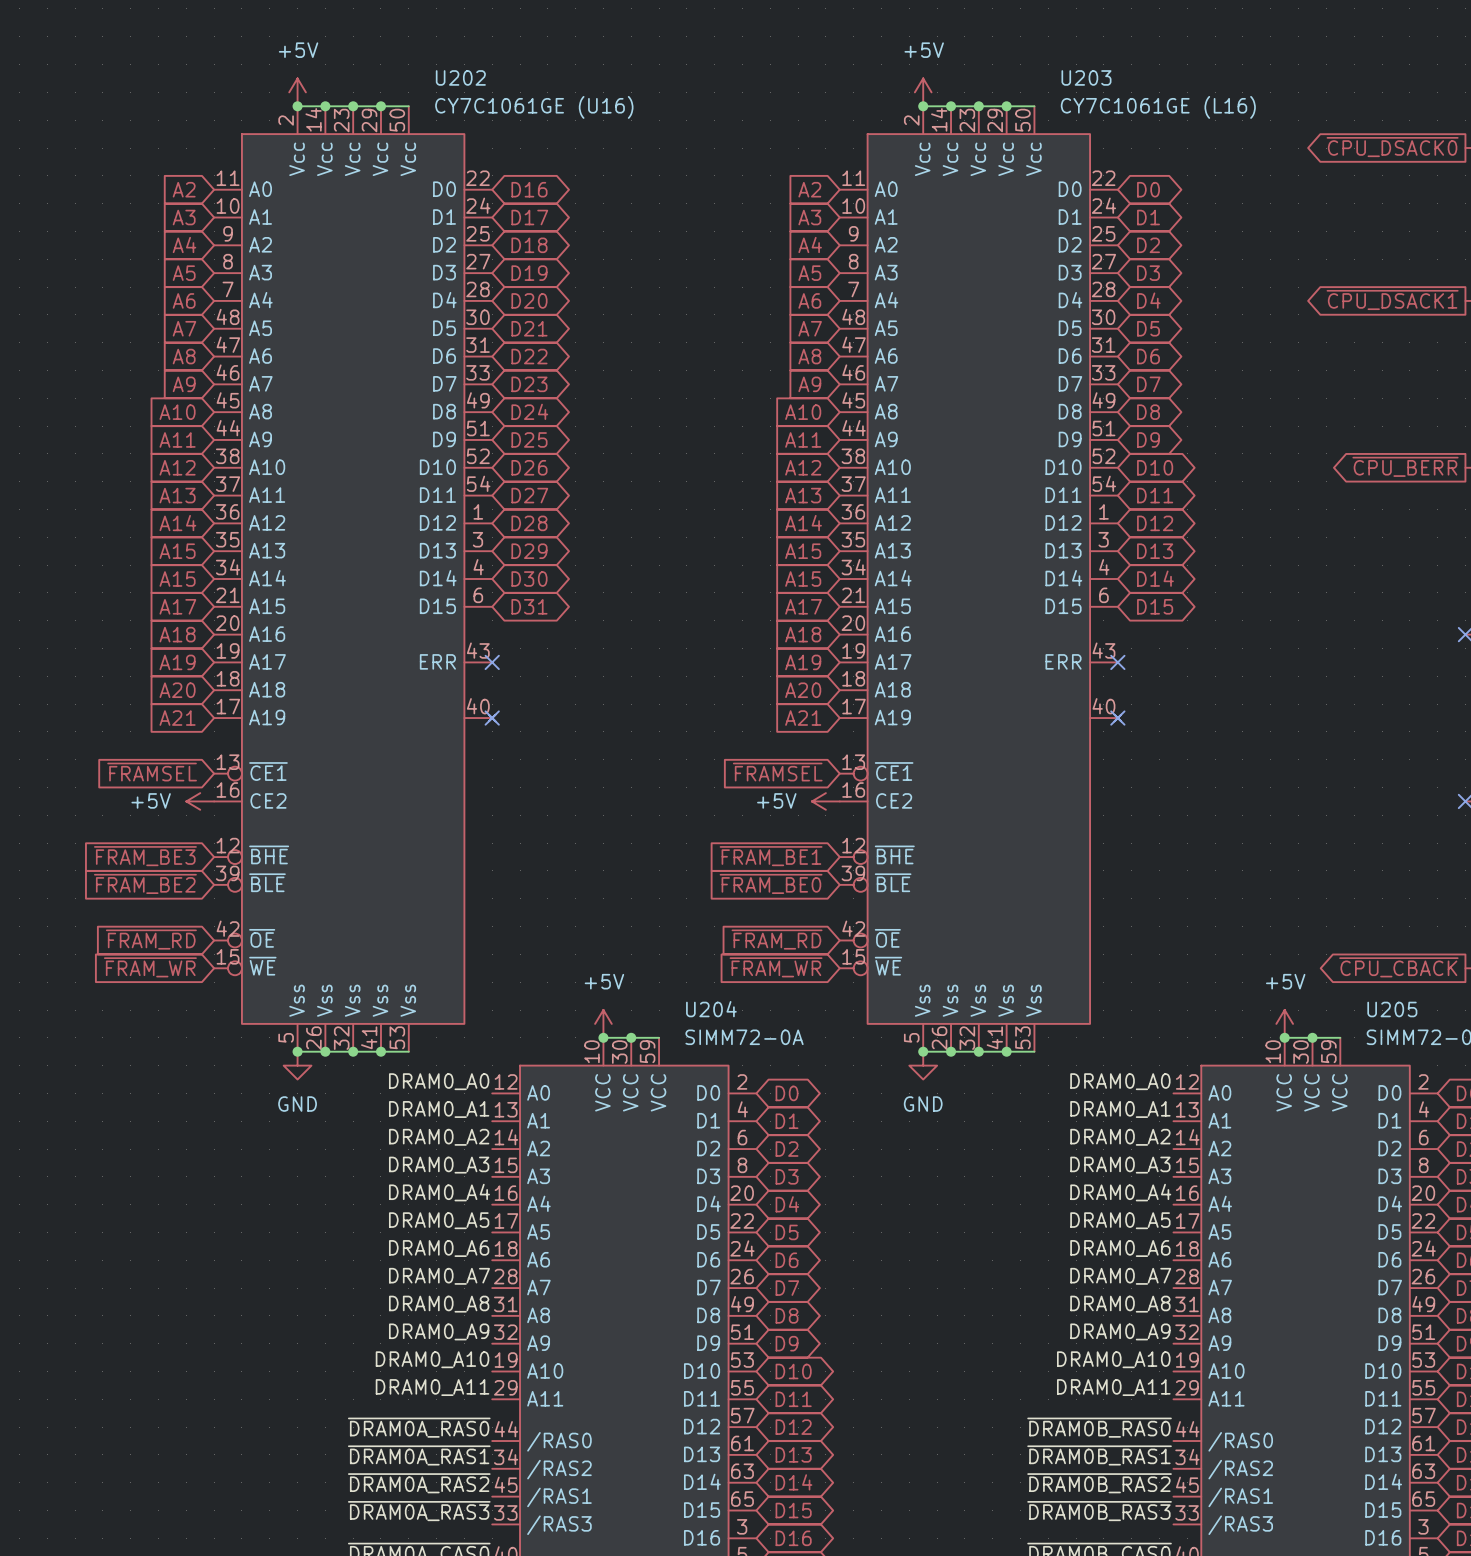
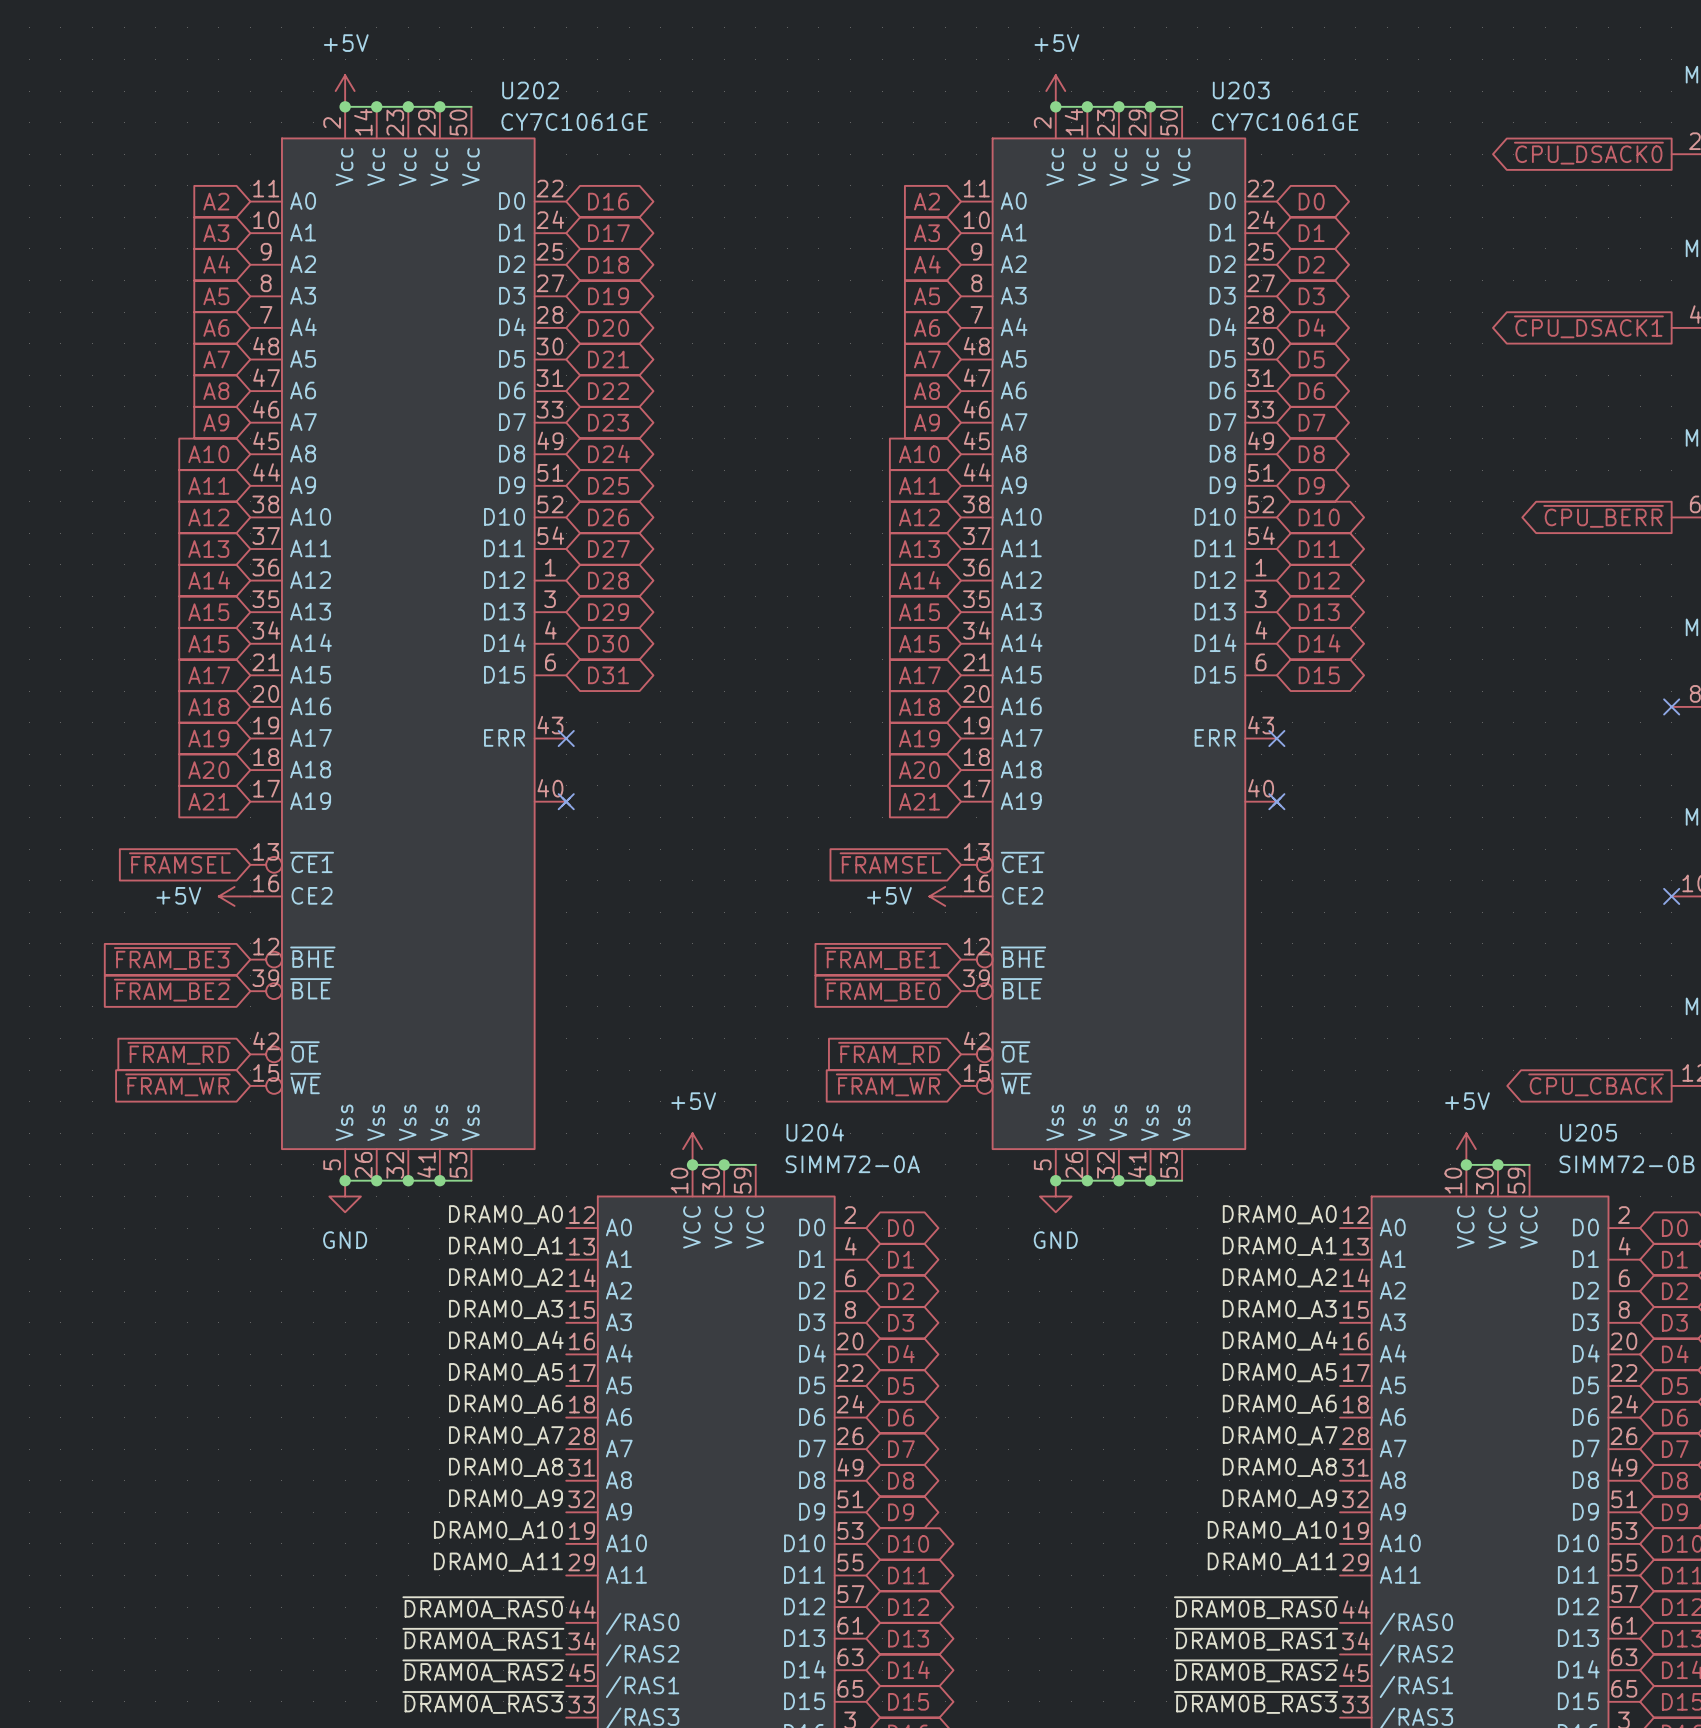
U202 name position: U202 (460, 77) -> U202 (530, 90)
U203 name position: U203 (1086, 77) -> U203 (1241, 90)
U202 value: CY7C1061GE (U16) (534, 107) -> CY7C1061GE (574, 122)
U203 value: CY7C1061GE (L16) (1158, 107) -> CY7C1061GE (1285, 122)

